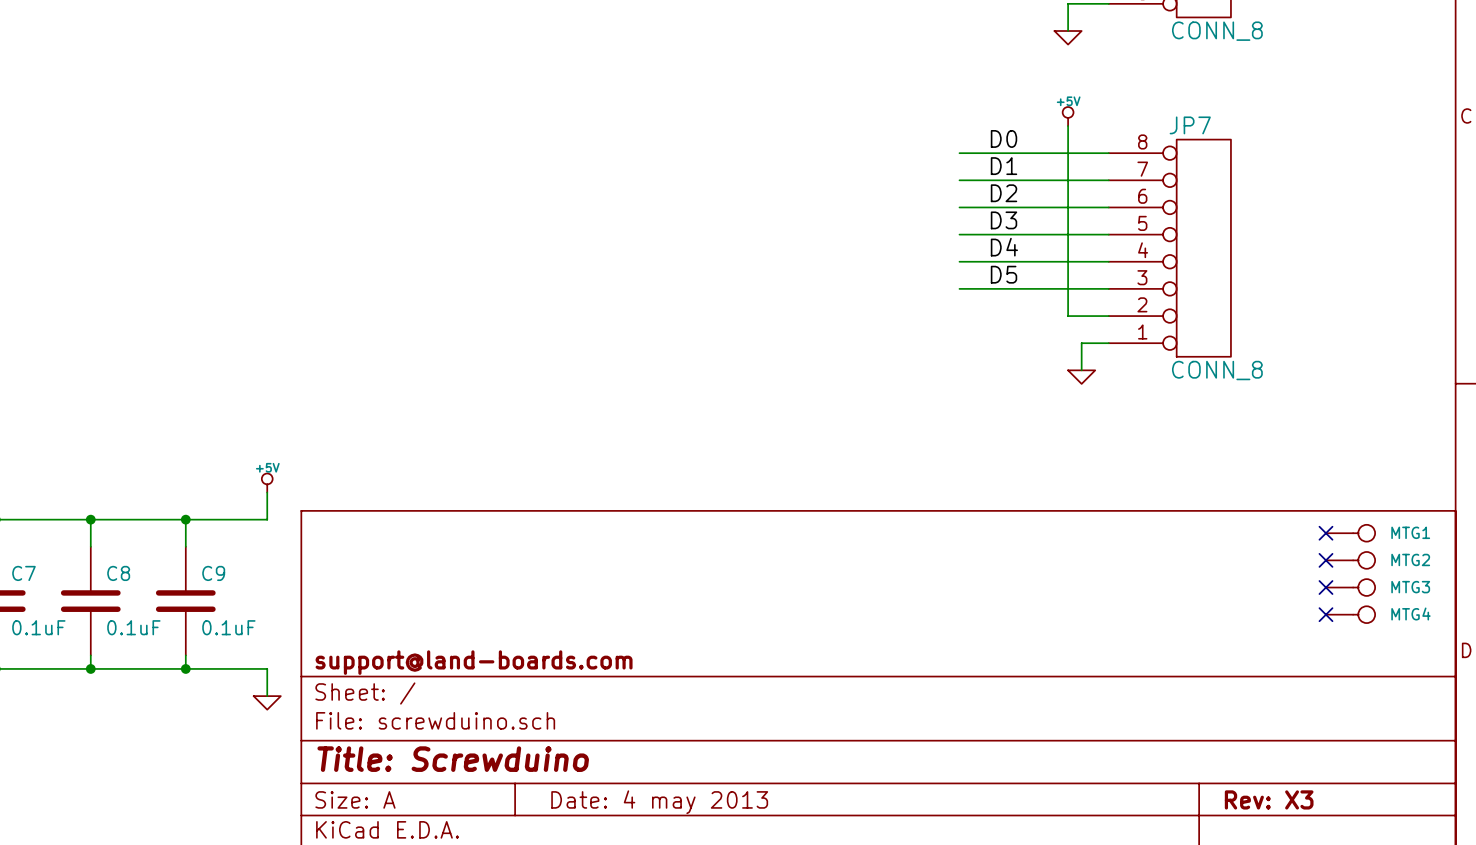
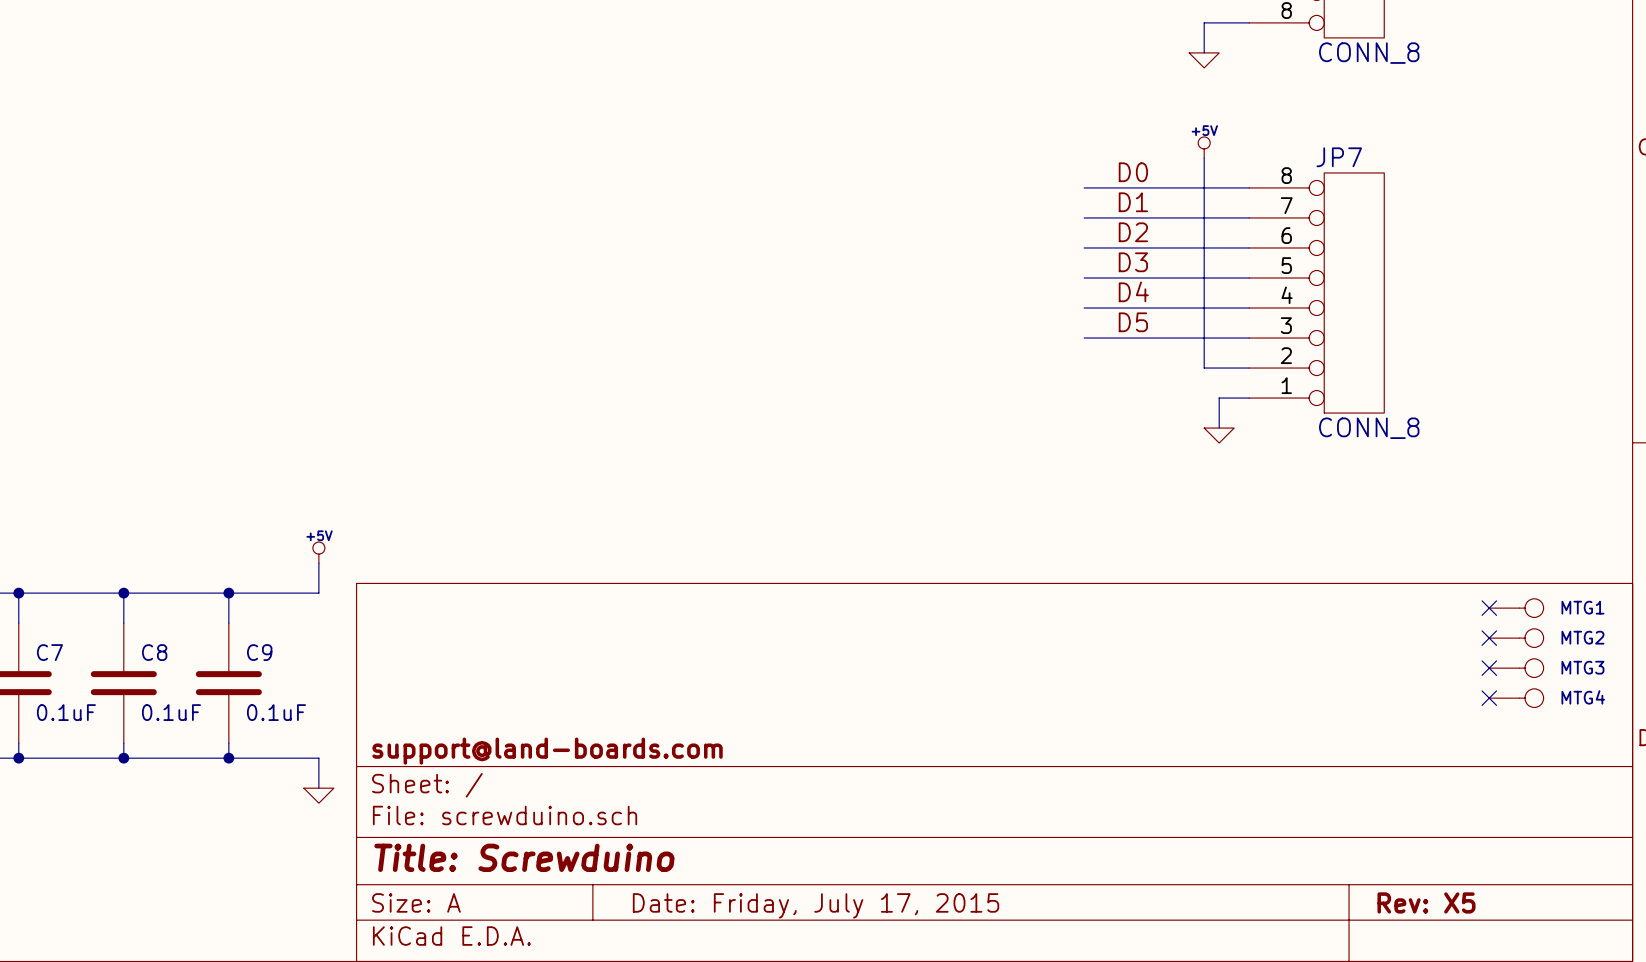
title block: Rev: X3 (1269, 799) -> Rev: X5 (1426, 902)
title block: Date: 4 may 2013 (659, 802) -> Date: Friday, July 17, 2015 (816, 905)

